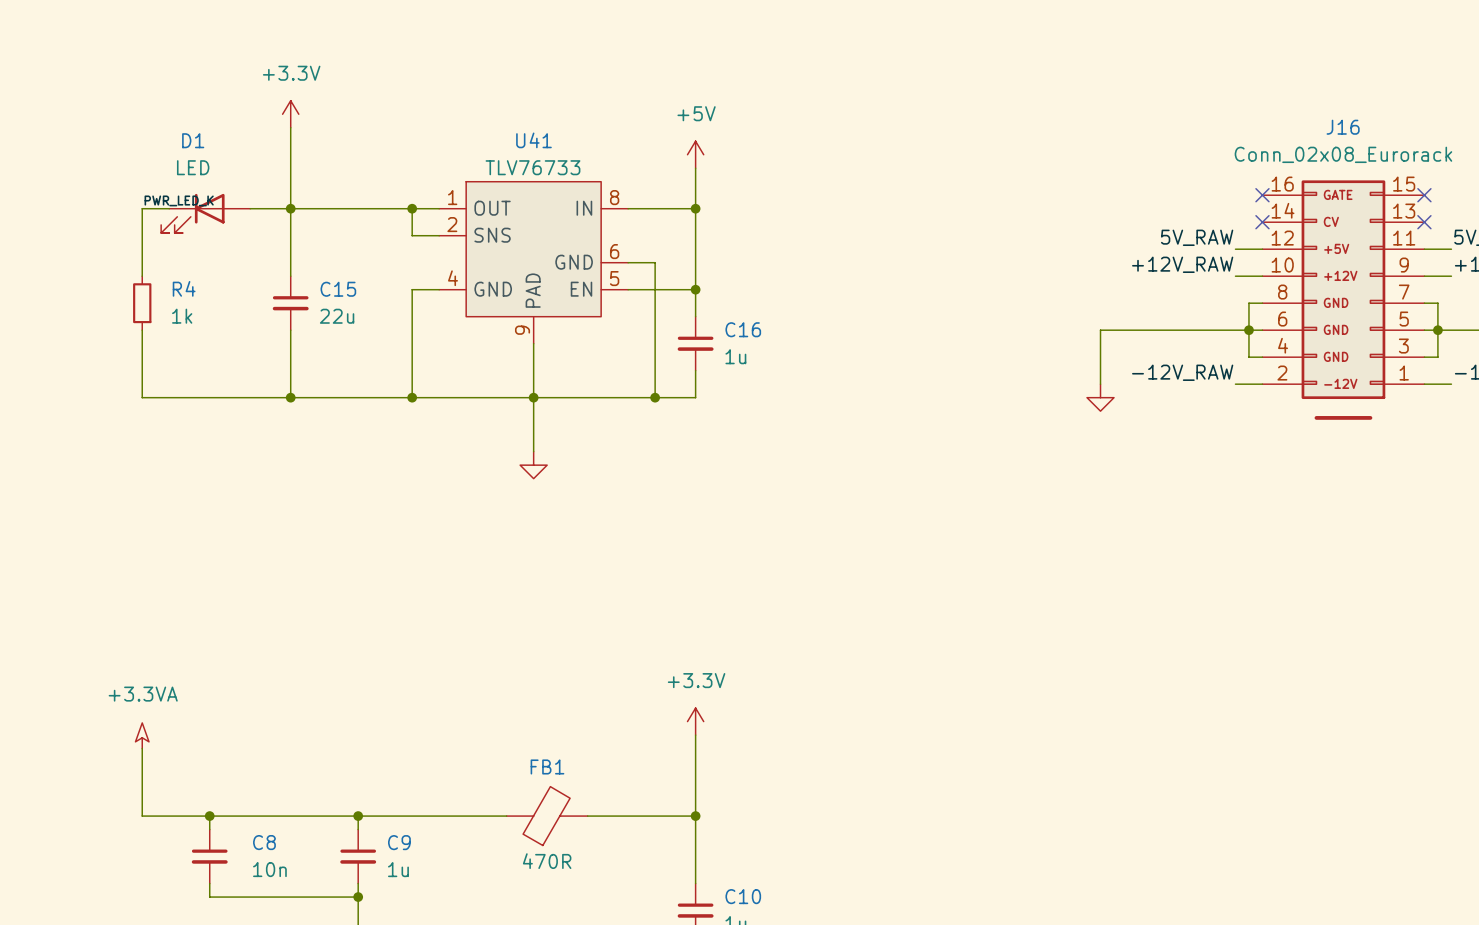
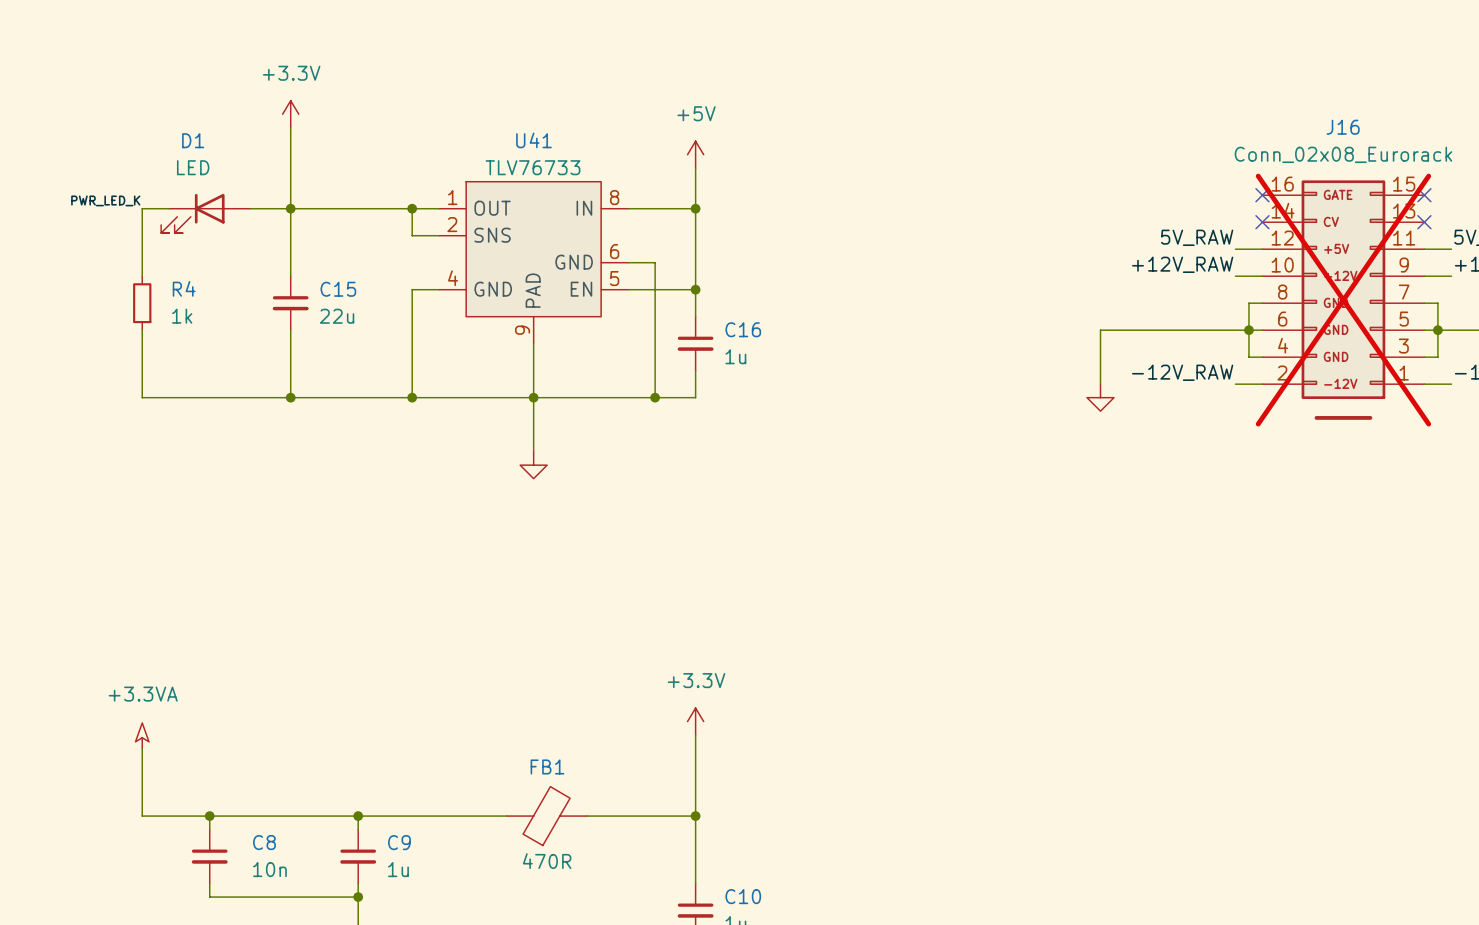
label position: PWR_LED_K (179, 200) -> PWR_LED_K (105, 200)
J16 do-not-place cross: none -> (1343, 300)

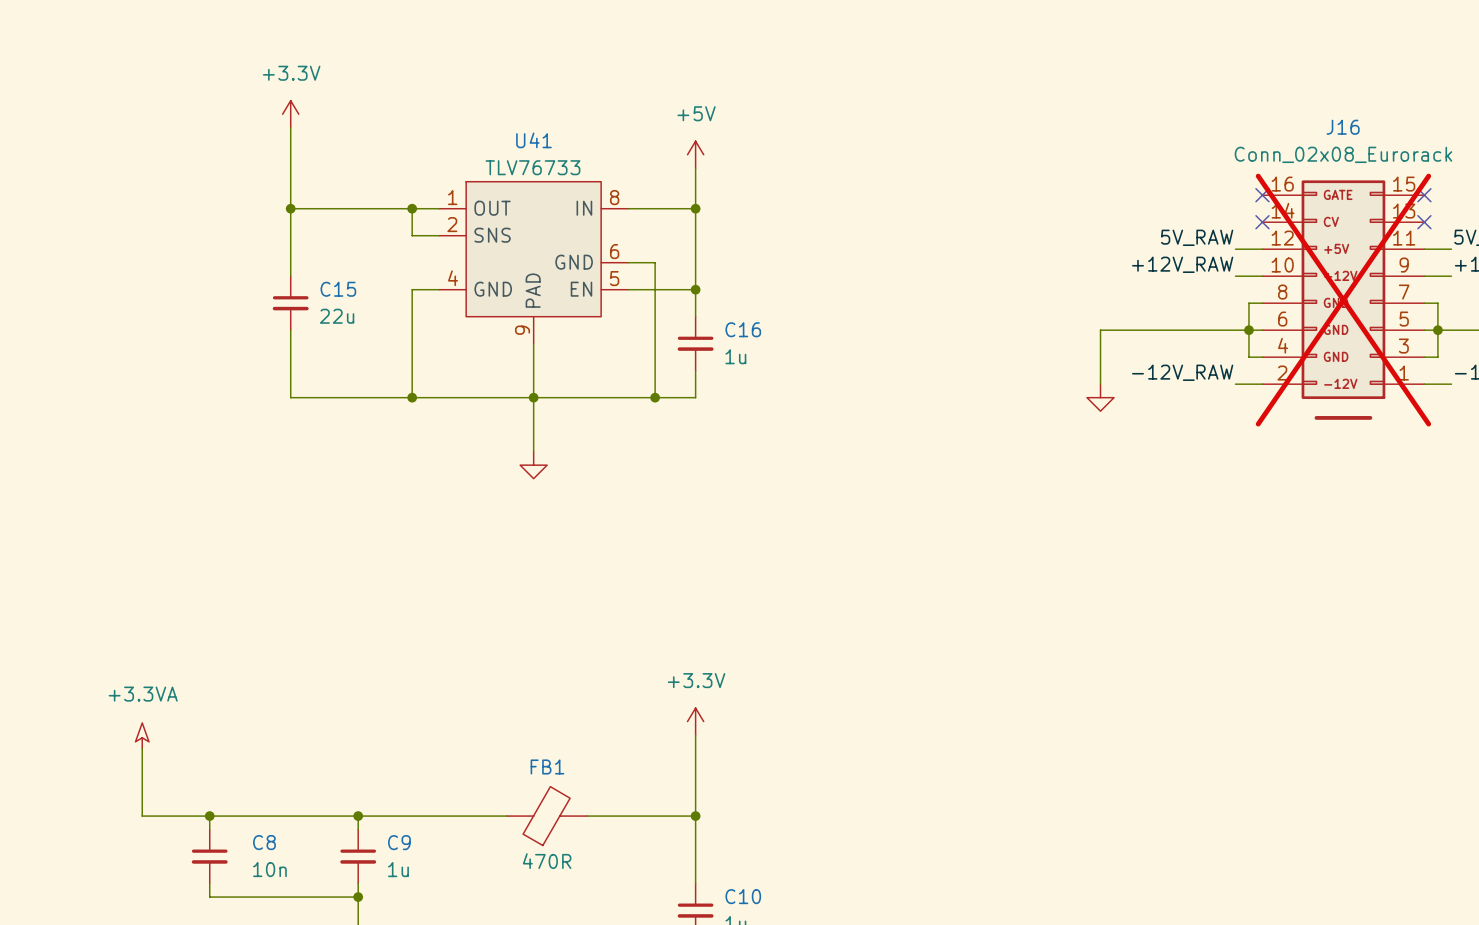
label: PWR_LED_K (105, 200) -> none
wire: (169, 208) (142, 208) (142, 276) -> none
wire: (250, 208) (290, 208) -> none
D1: LED (205, 213) -> none
R4: 1k (142, 303) -> none
wire: (142, 330) (142, 397) (290, 397) -> none
junction: (290, 397) -> none

